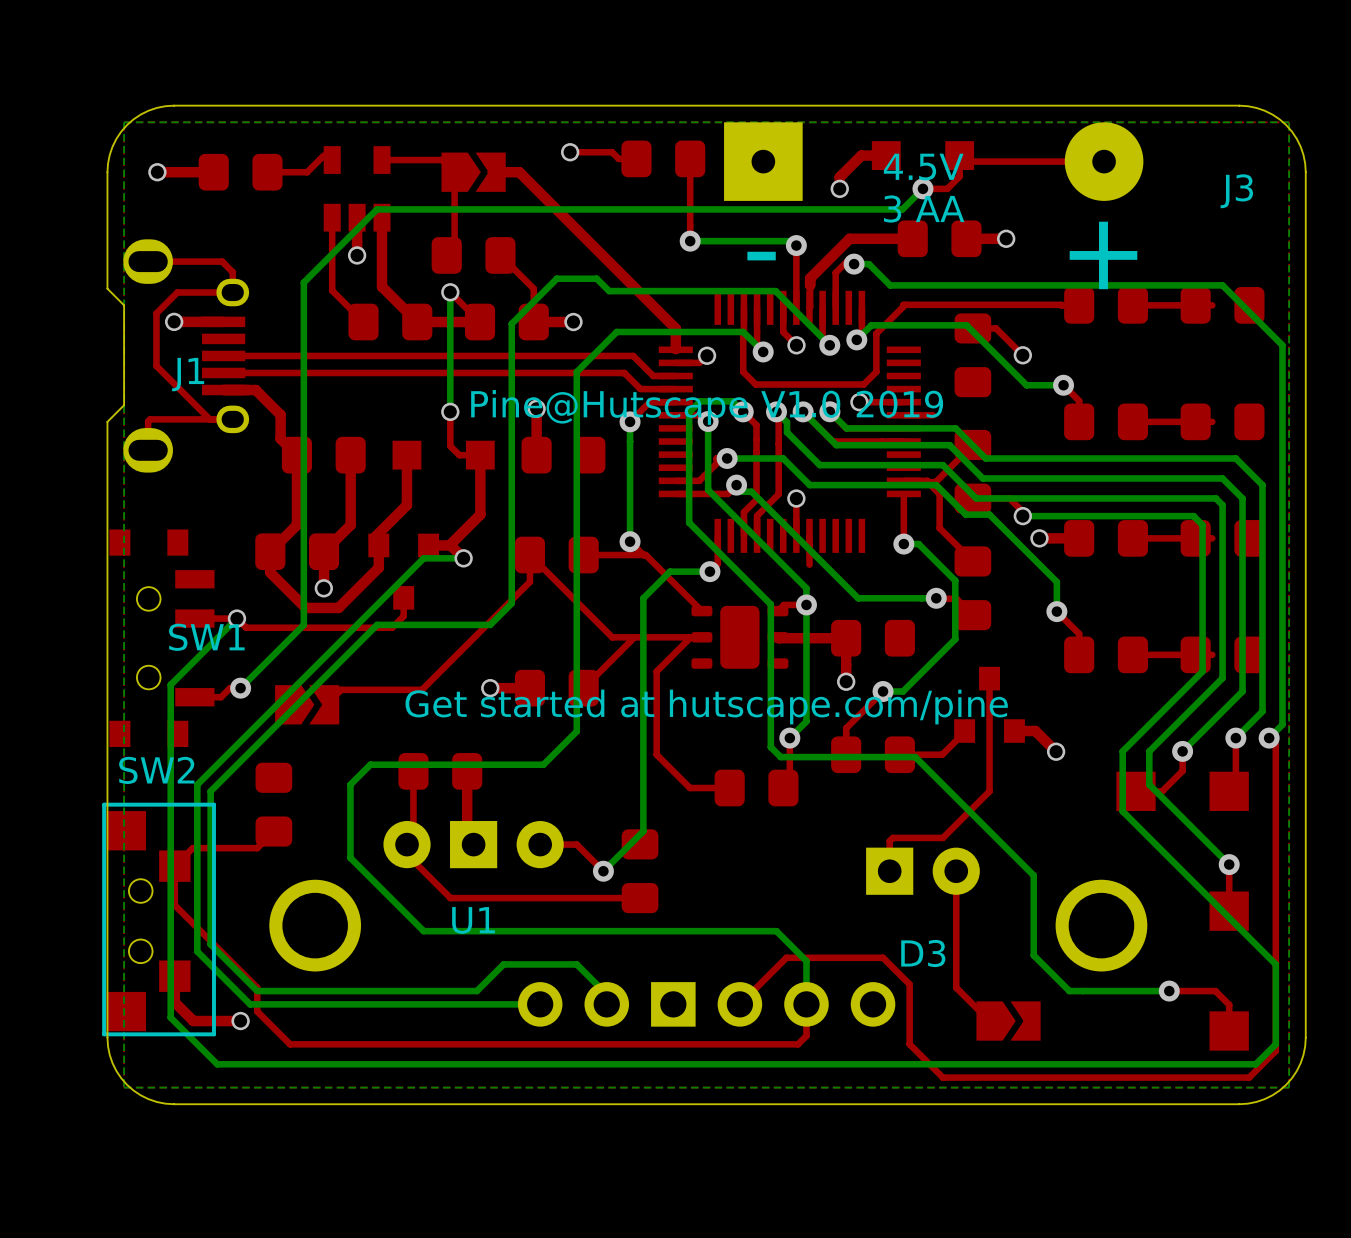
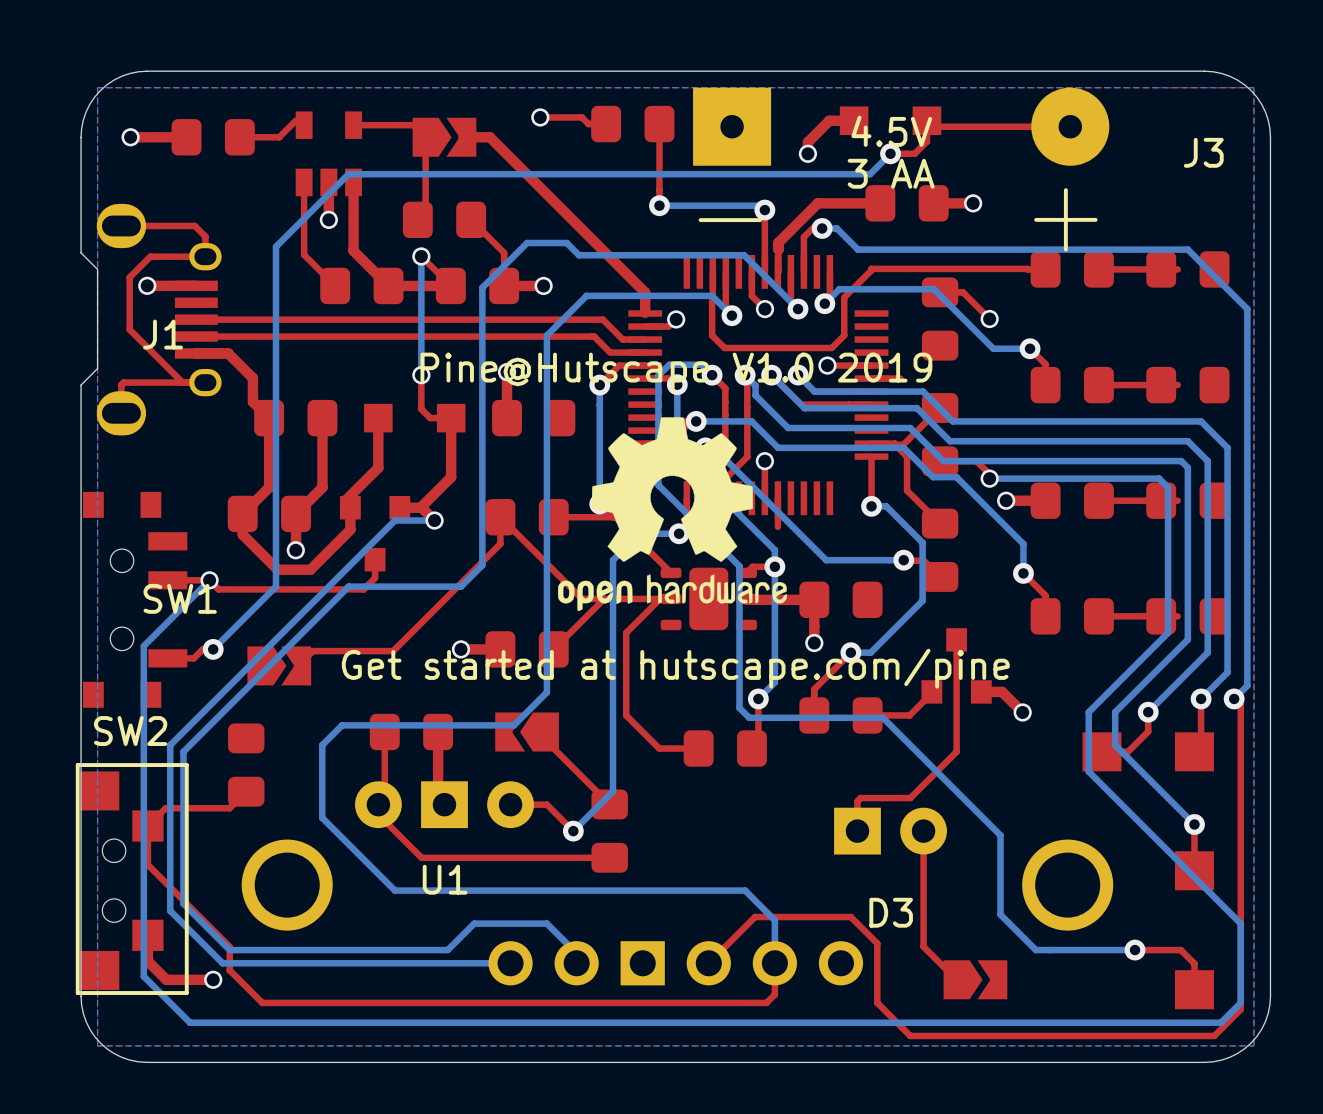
drawing: none -> [557, 417, 787, 612]
part: none -> (527, 731)
top track: none -> (545, 731) (545, 740) (609, 804)

